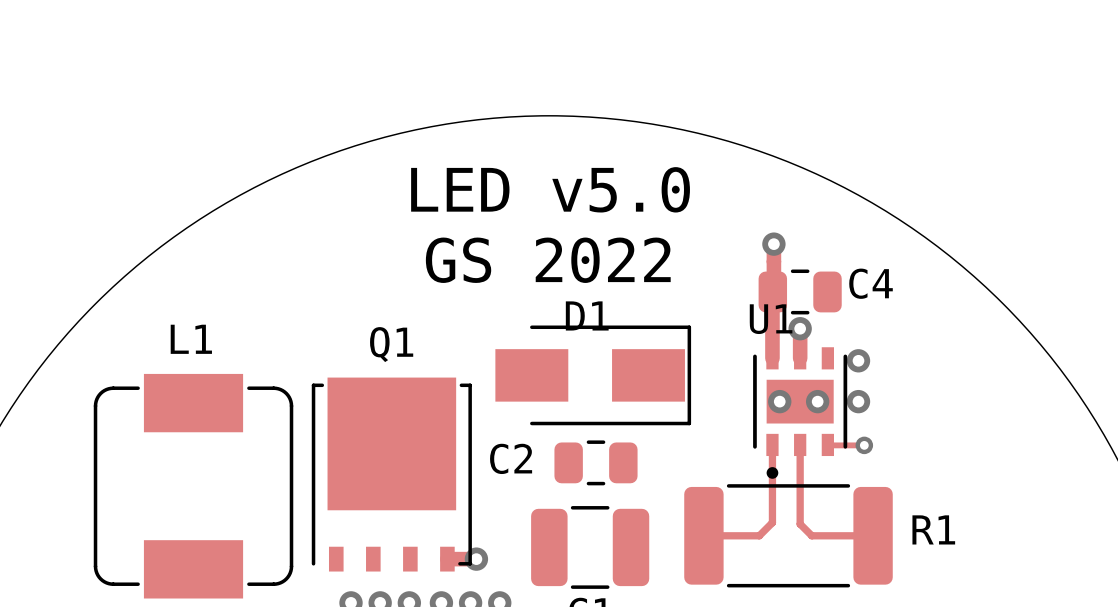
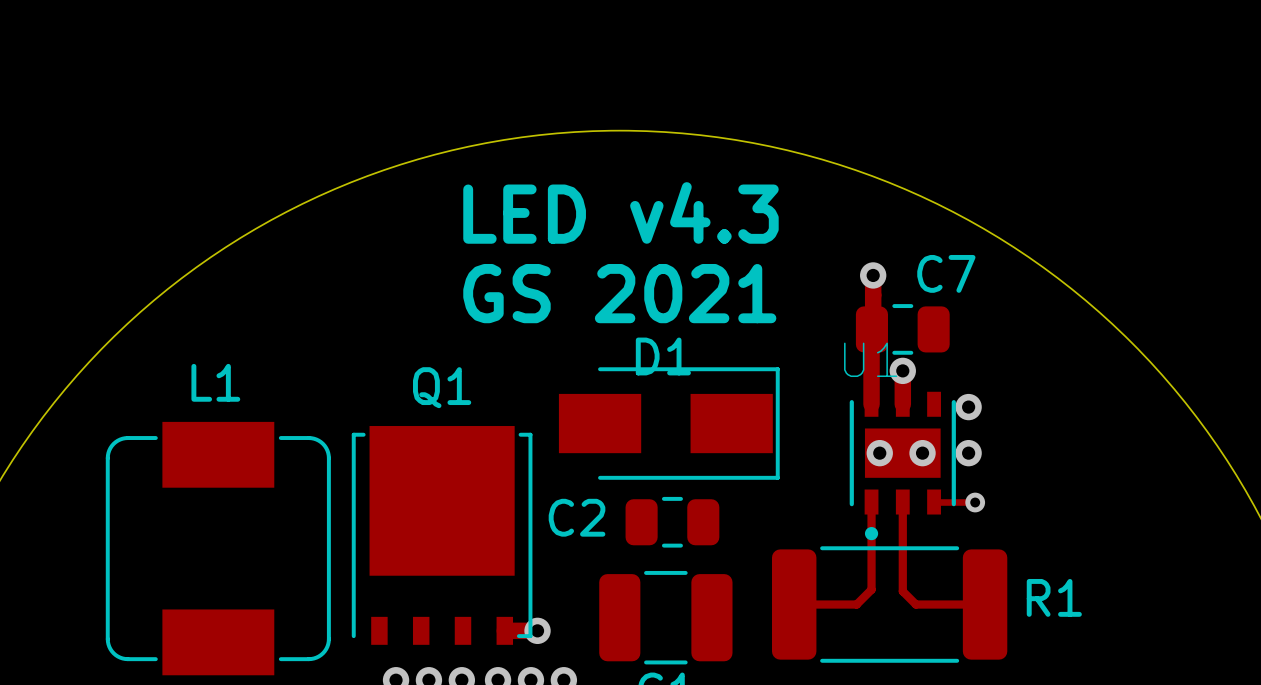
text: LED v5.0 (550, 189) -> LED v4.3 (620, 212)
text: GS 2022 (548, 260) -> GS 2021 (619, 293)
C4 name: C4 (871, 283) -> C7 (946, 273)

